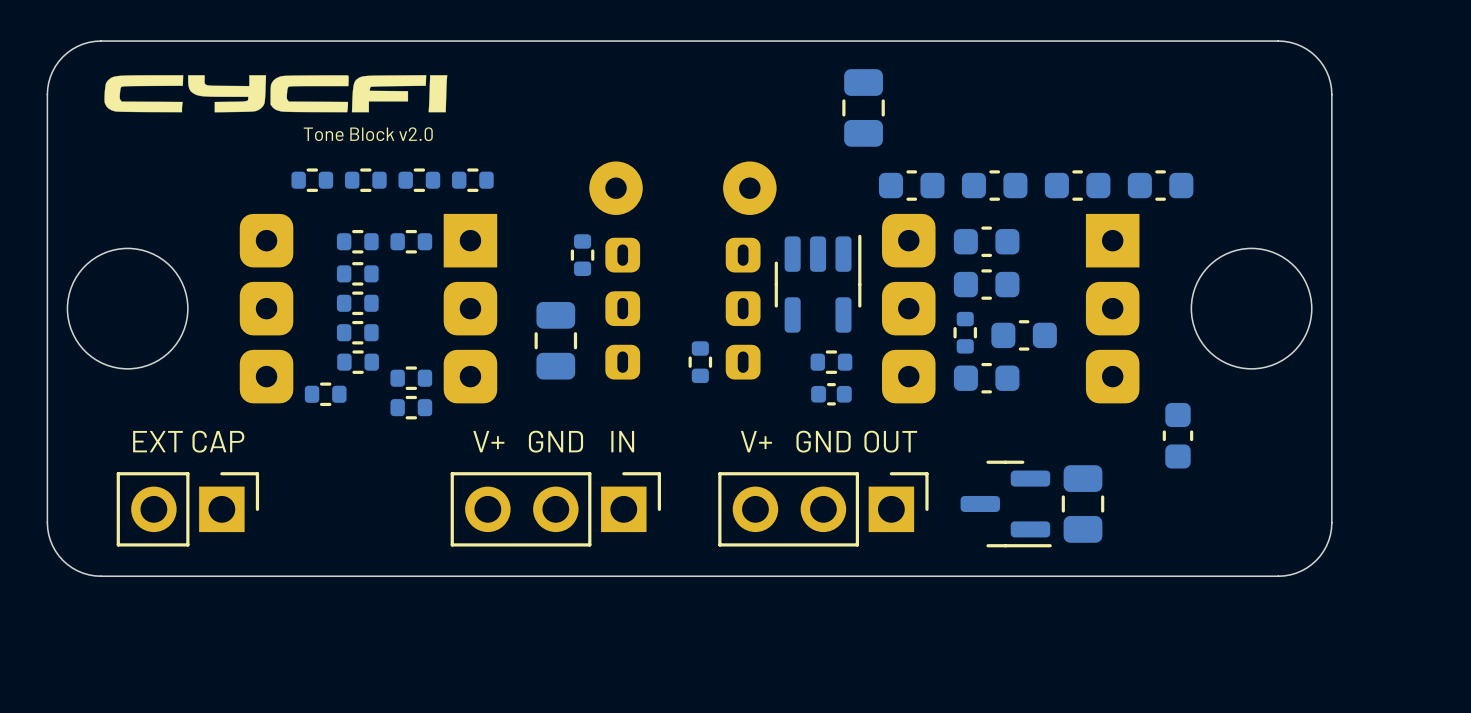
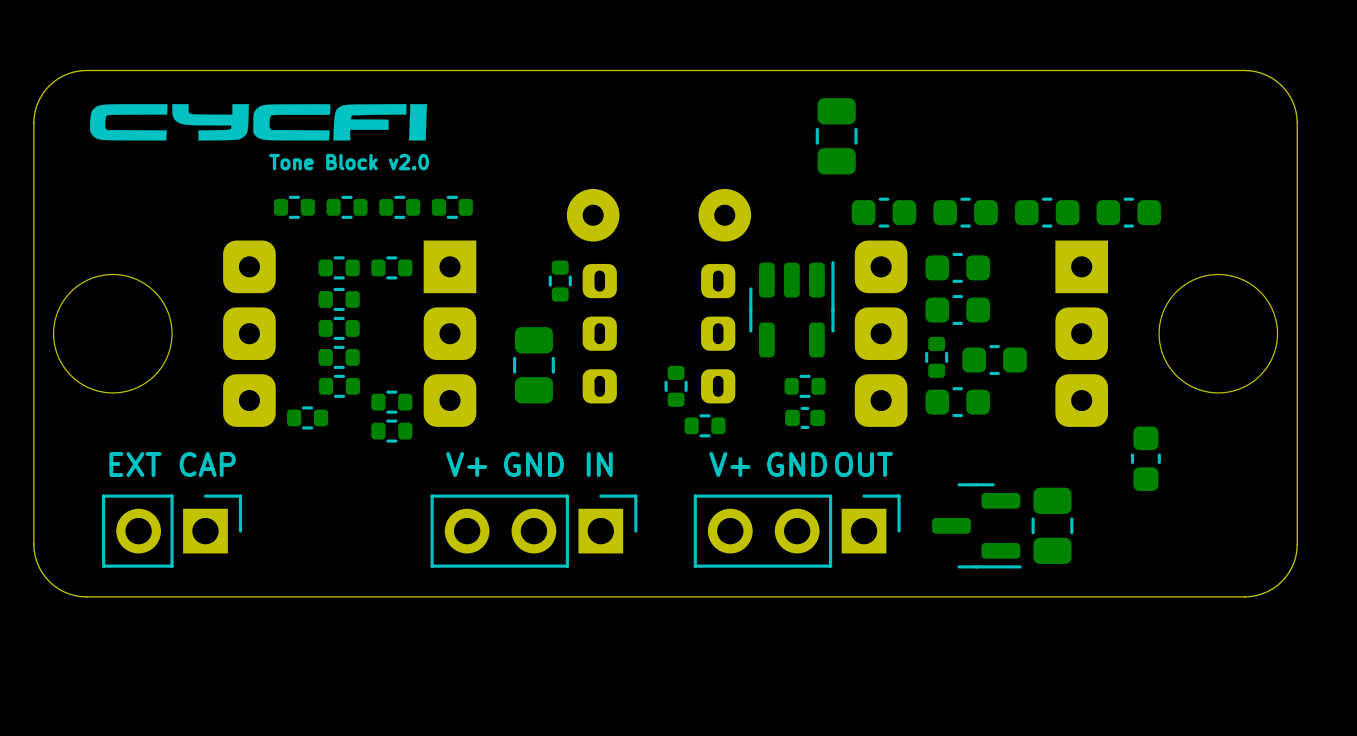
part: none -> (705, 425)

